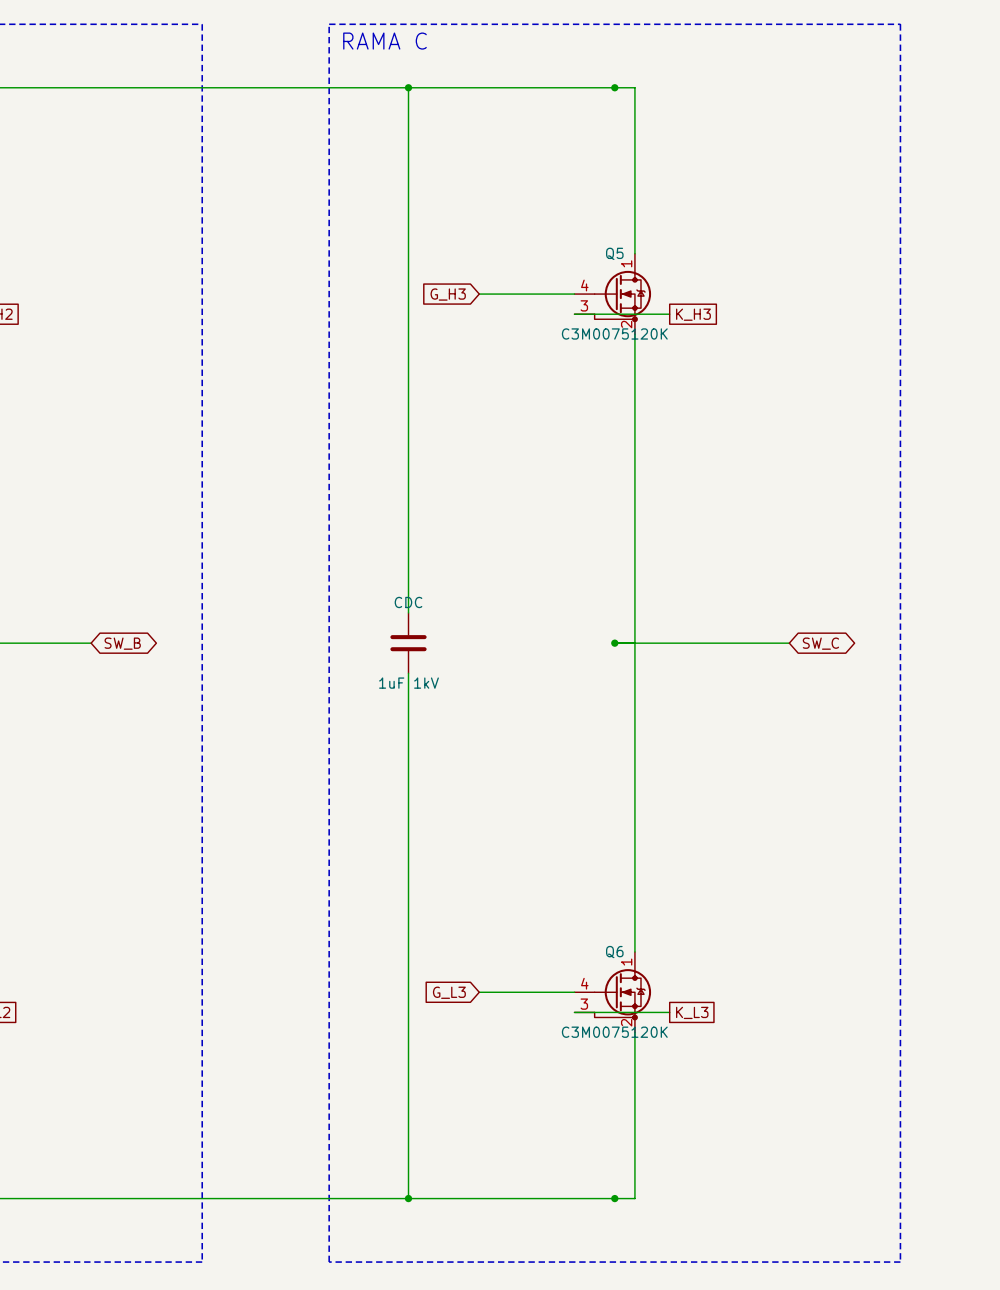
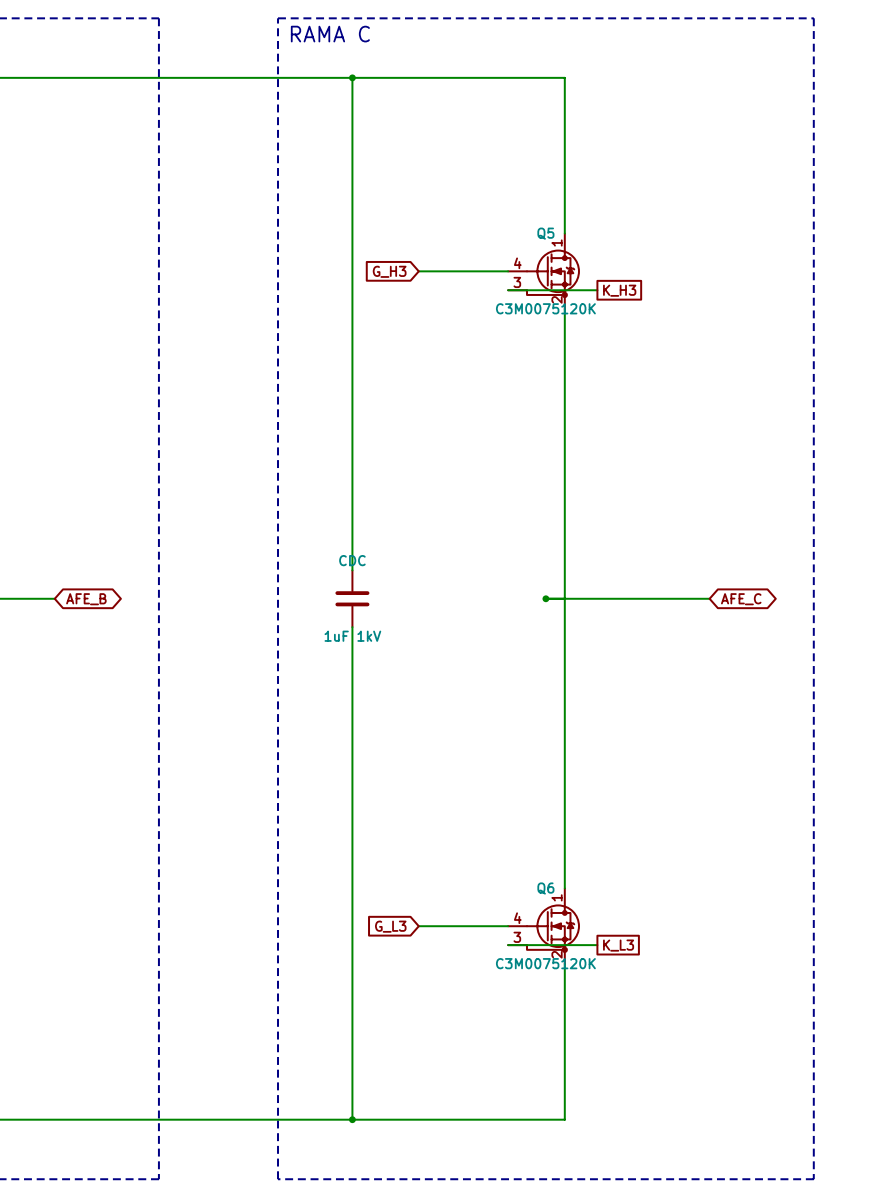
junction: (614, 87) -> none
global label: SW_B (122, 643) -> AFE_B (86, 599)
global label: SW_C (820, 643) -> AFE_C (741, 599)
junction: (614, 1198) -> none

